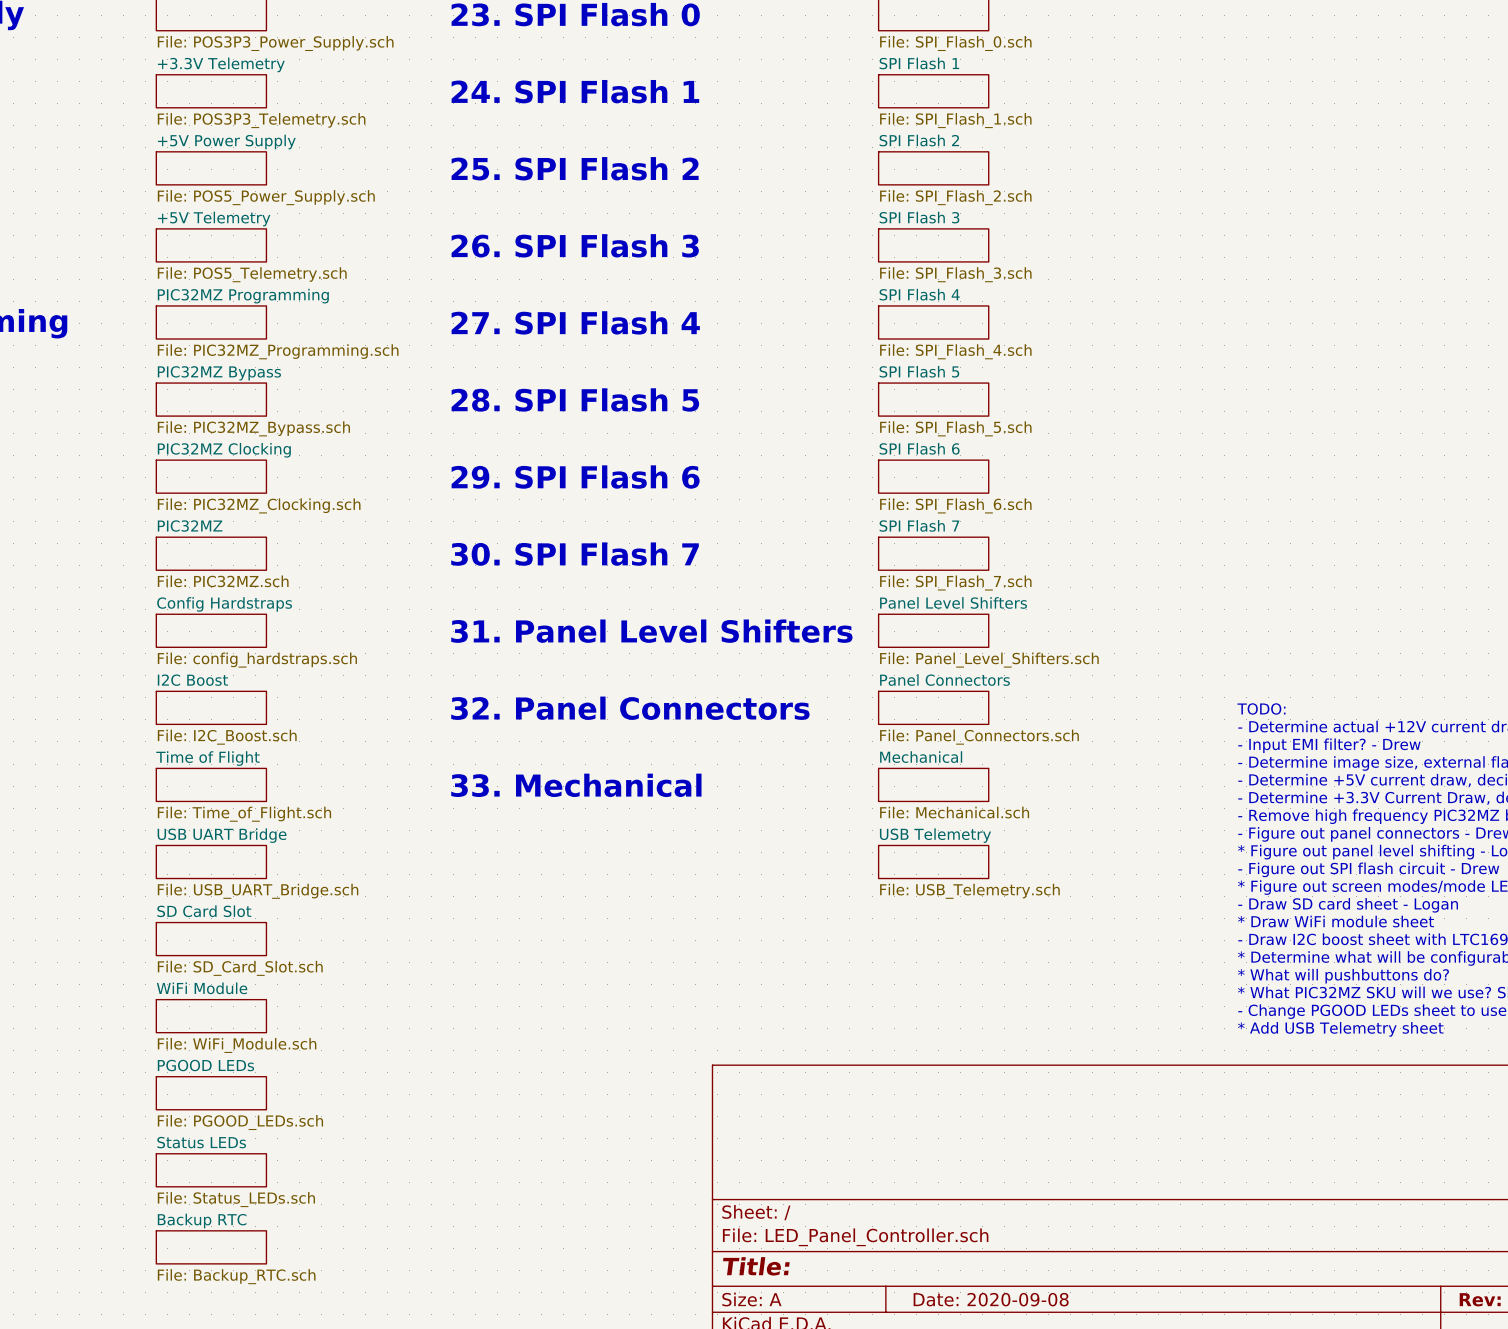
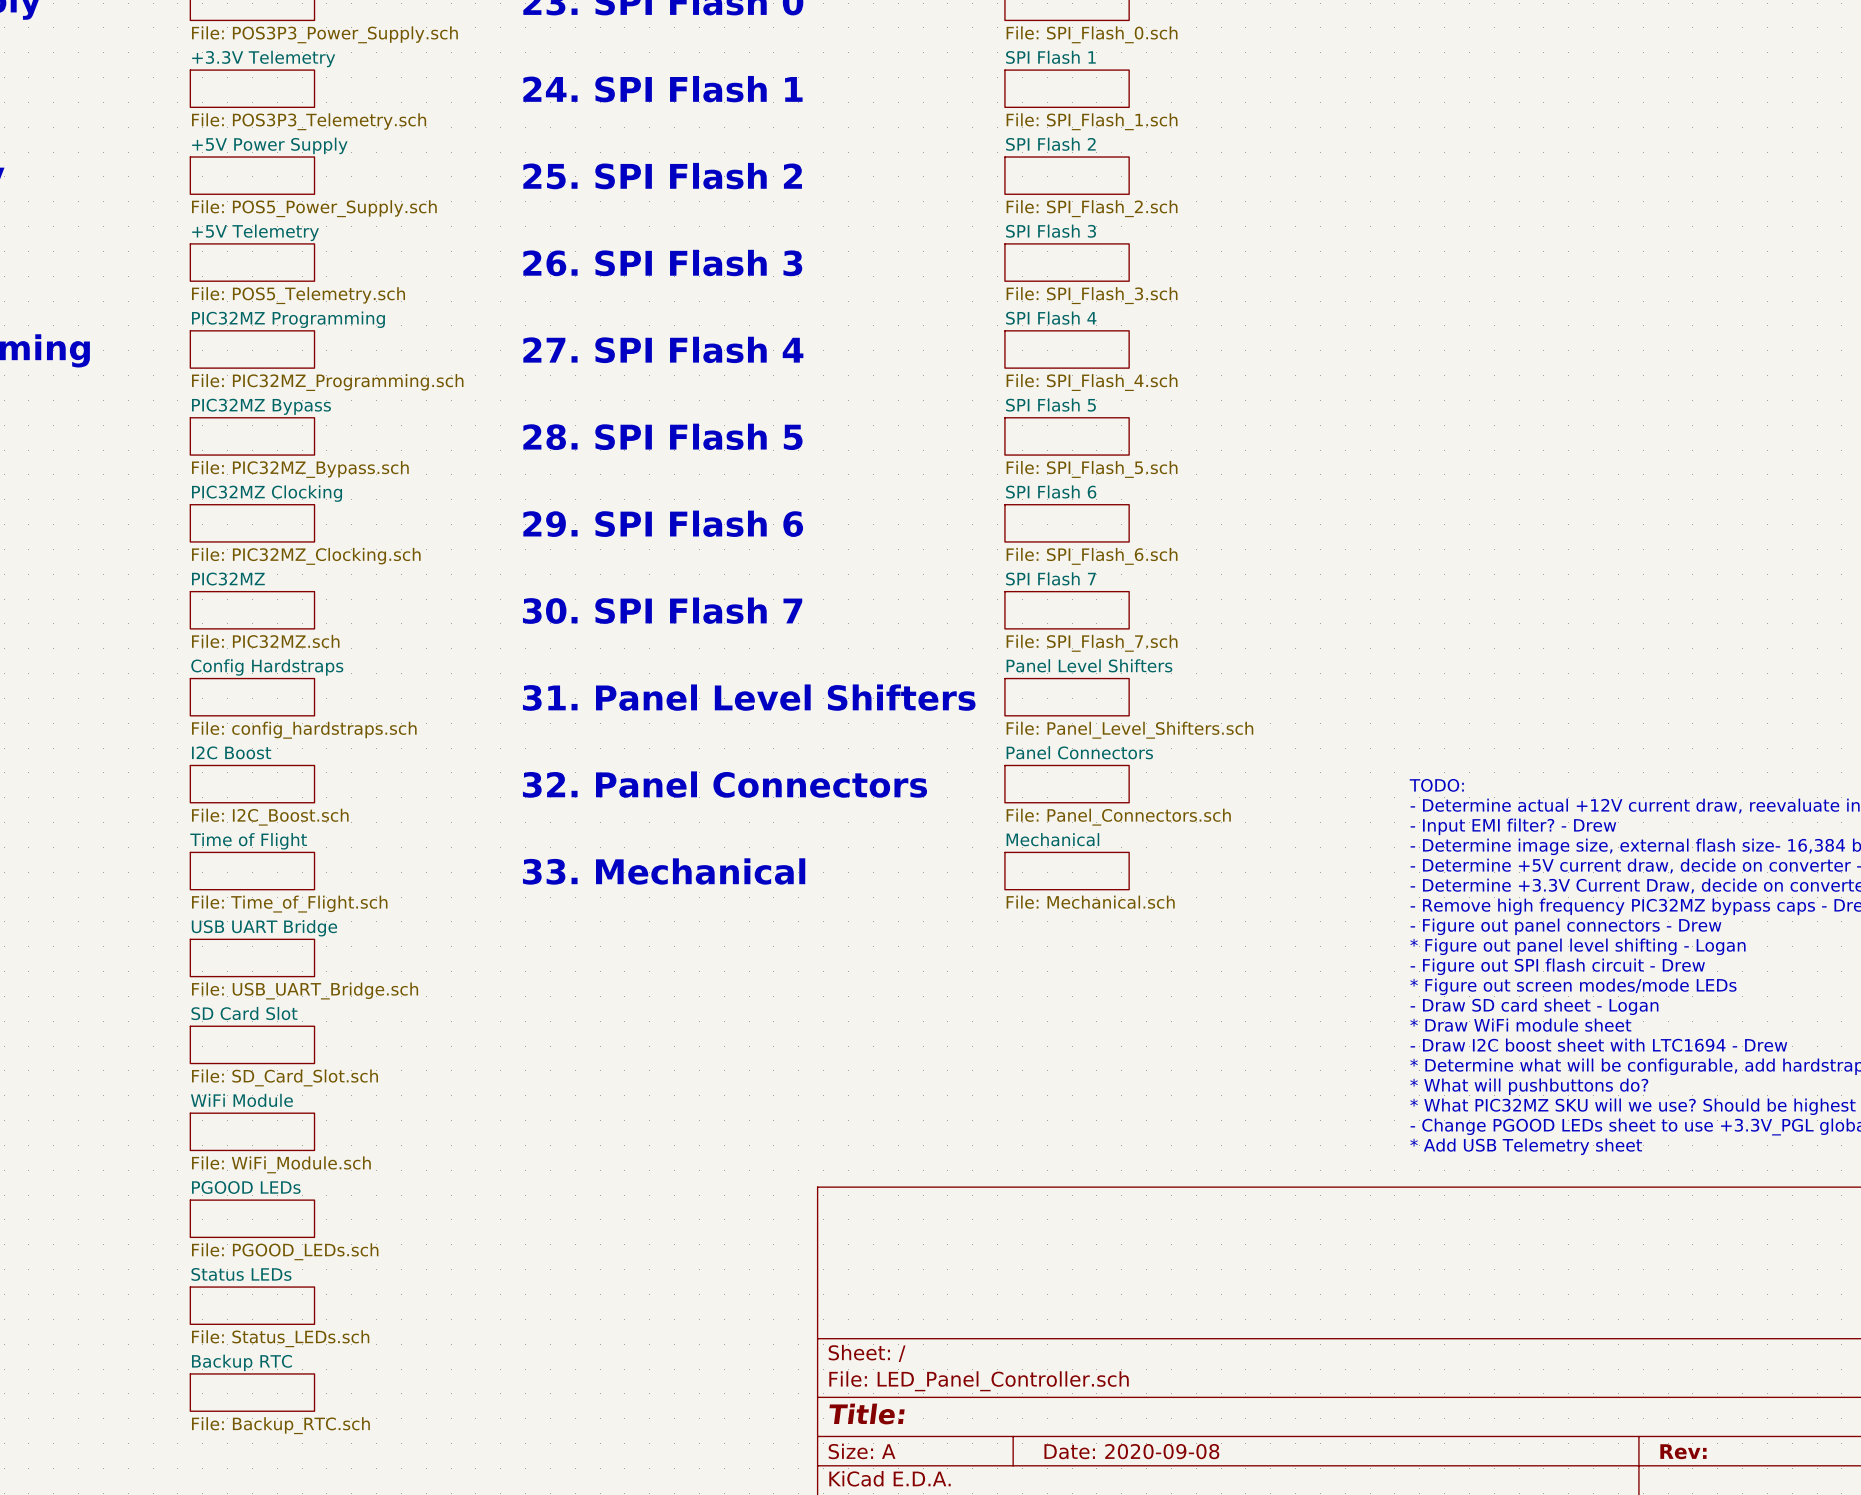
sheet USB Telemetry: File: USB_Telemetry.sch (933, 862) -> none

